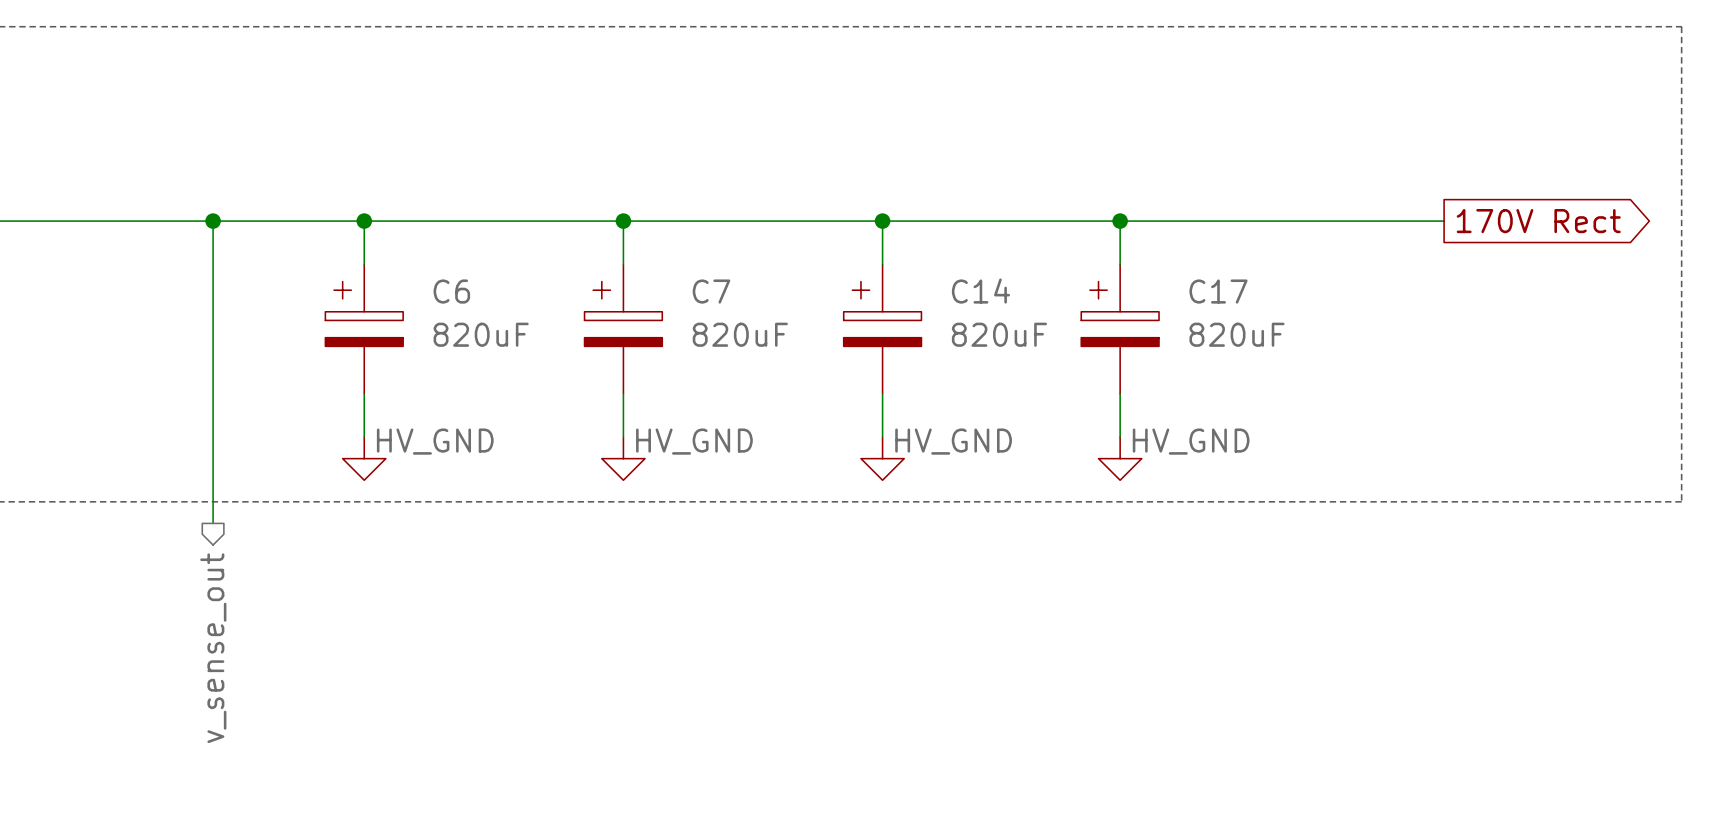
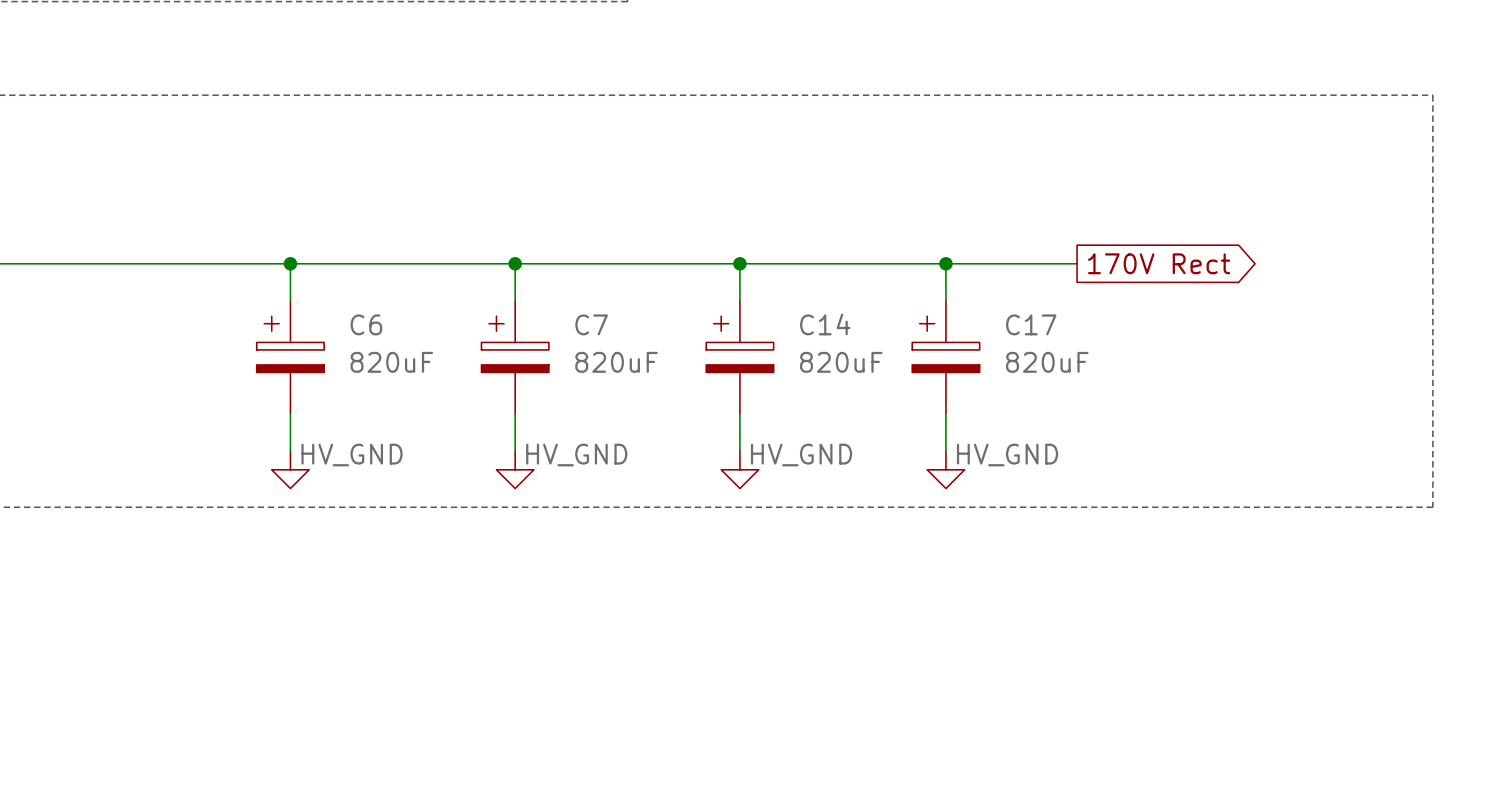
wire: (213, 221) (213, 523) -> none
junction: (213, 221) -> none
wire: (1271, 221) (1444, 221) -> none
global label position: 170V Rect (1538, 221) -> 170V Rect (1159, 263)
hierarchical label: v_sense_out (213, 648) -> none

